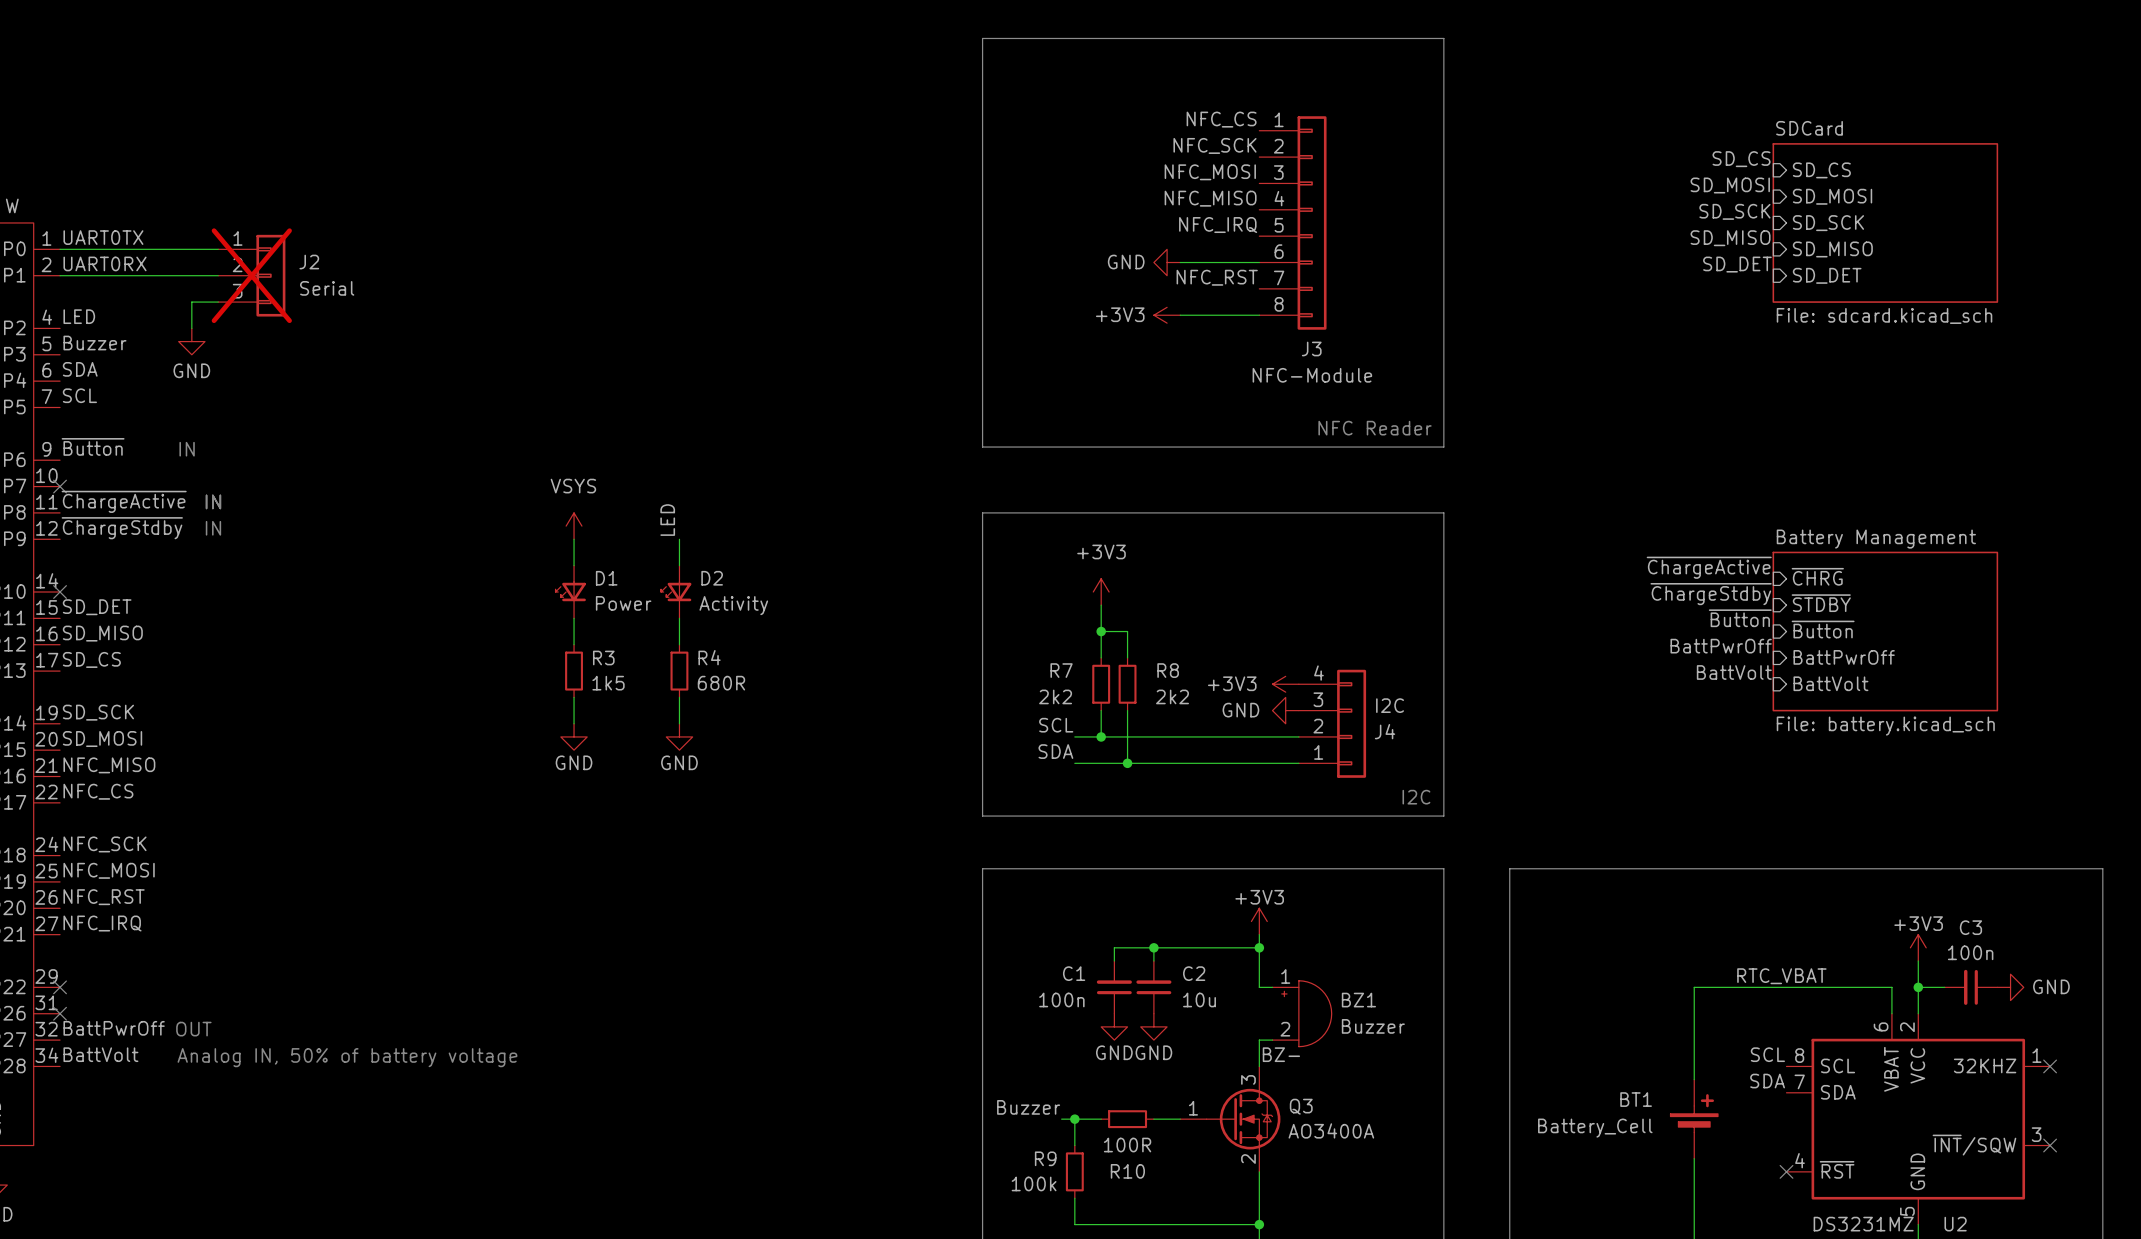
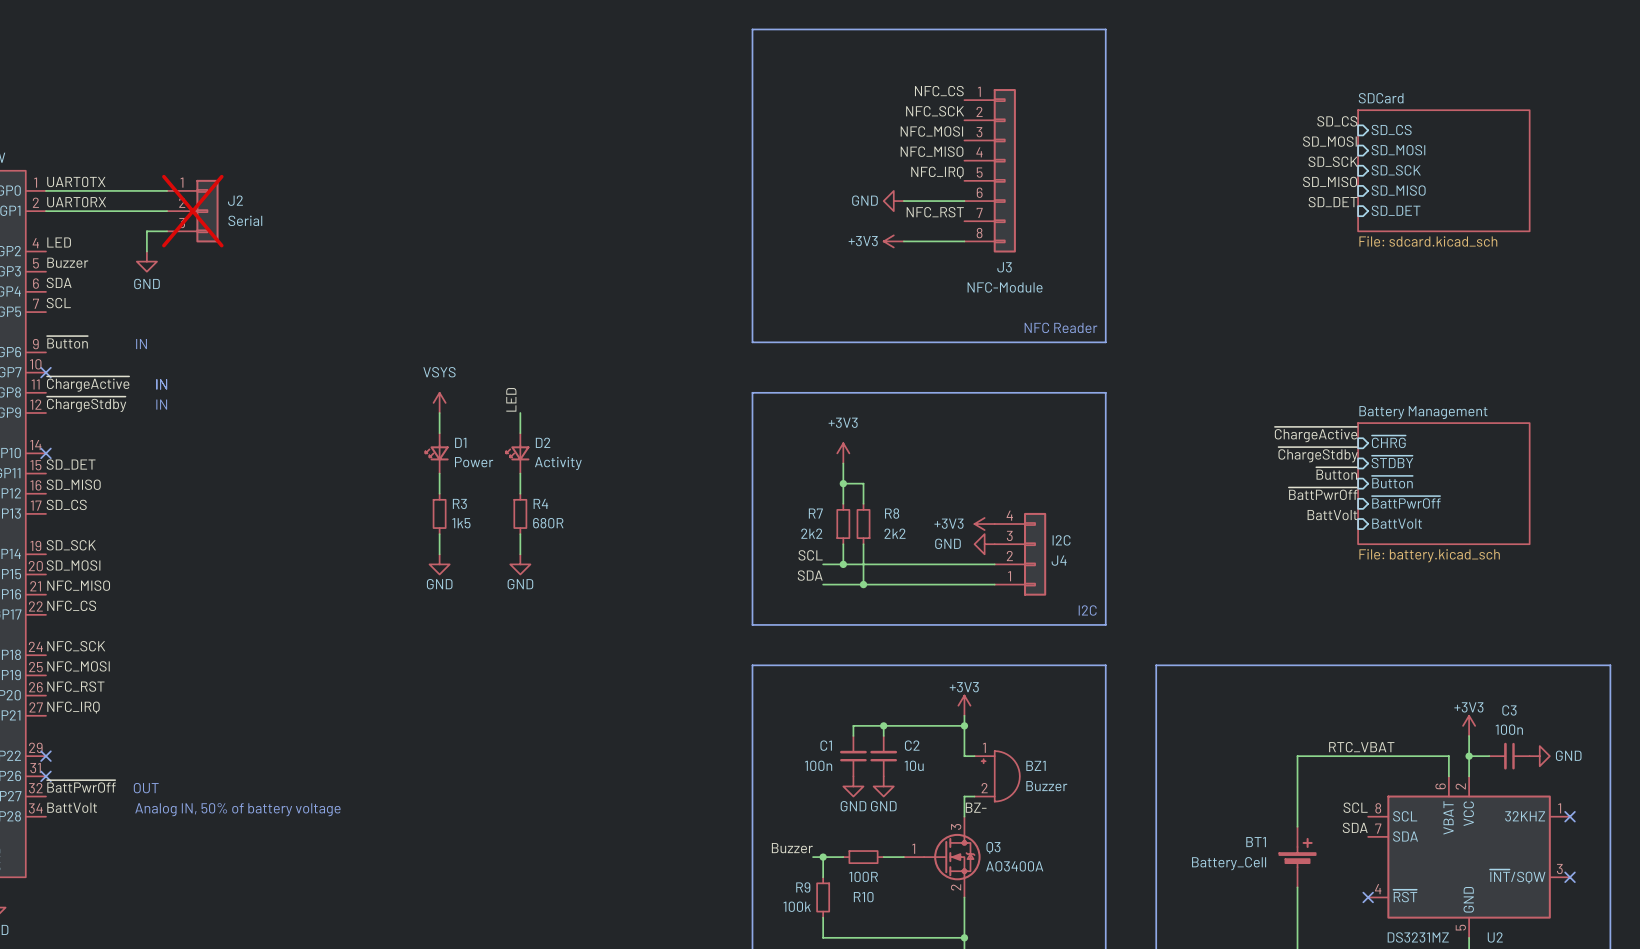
label: BattPwrOff (1721, 646) -> ~{BattPwrOff} (1323, 493)
sheet pin: BattPwrOff (1844, 657) -> ~{BattPwrOff} (1406, 502)
label: BattPwrOff (114, 1028) -> ~{BattPwrOff} (81, 786)

